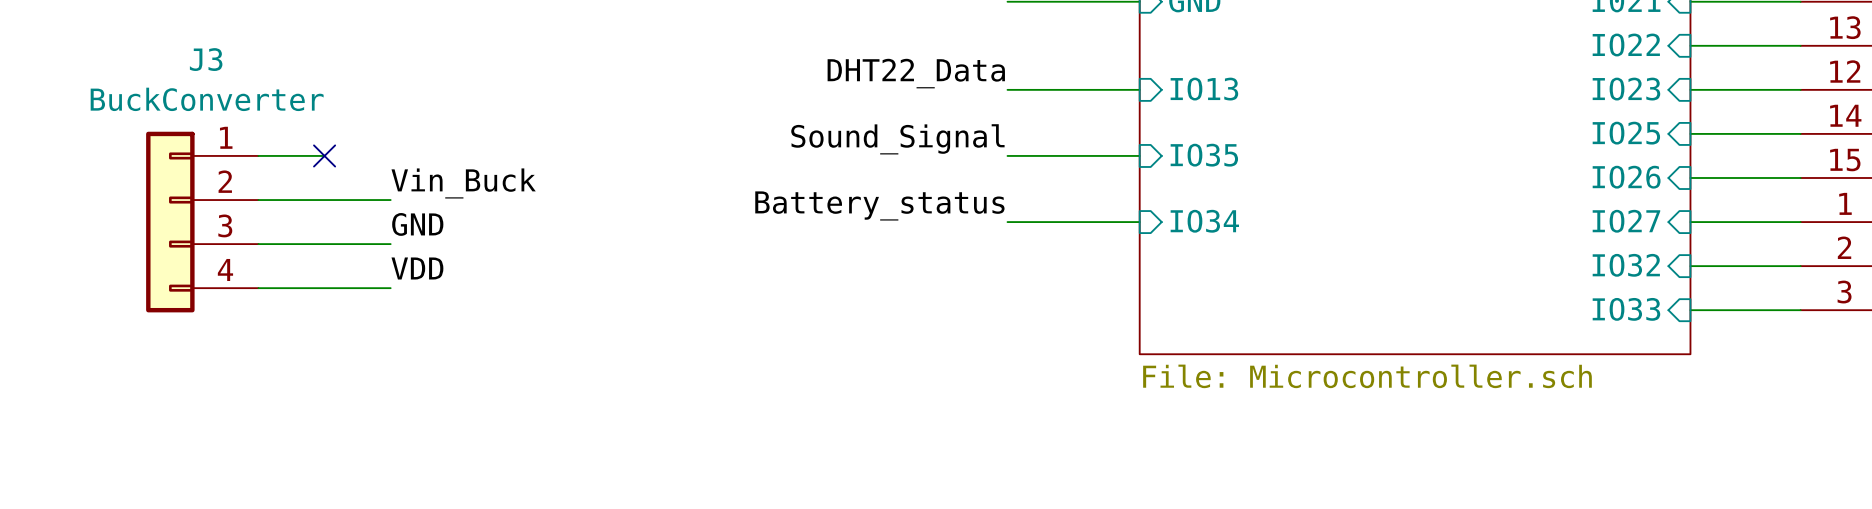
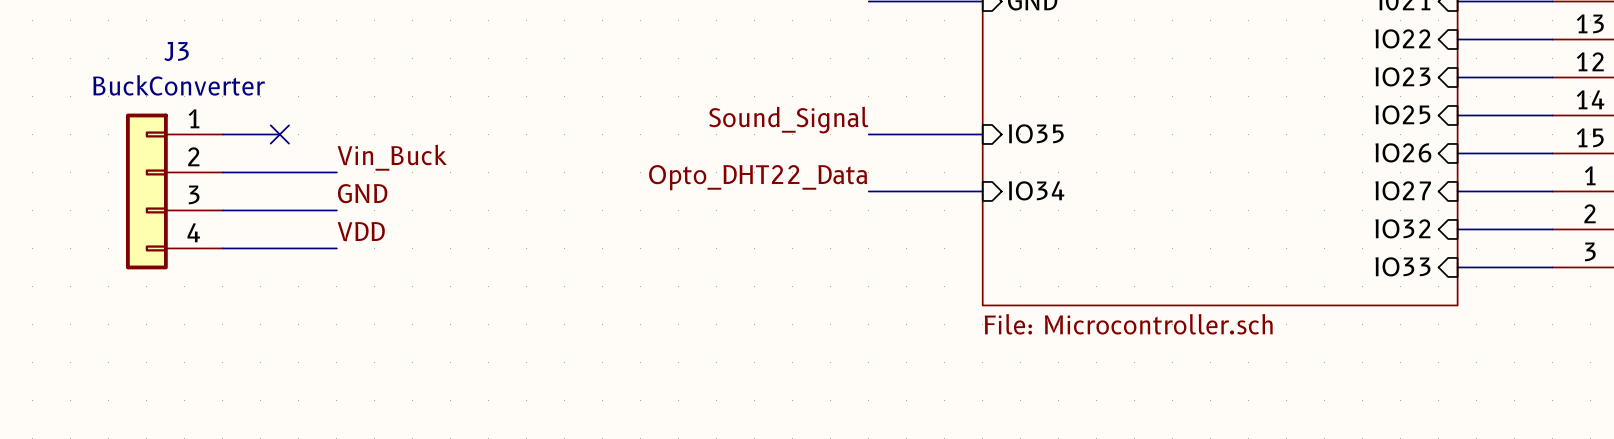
label: DHT22_Data (916, 73) -> none
wire: (1007, 89) (1139, 89) -> none
sheet pin: IO13 (1204, 89) -> none
label: Battery_status (879, 205) -> Opto_DHT22_Data (758, 177)

